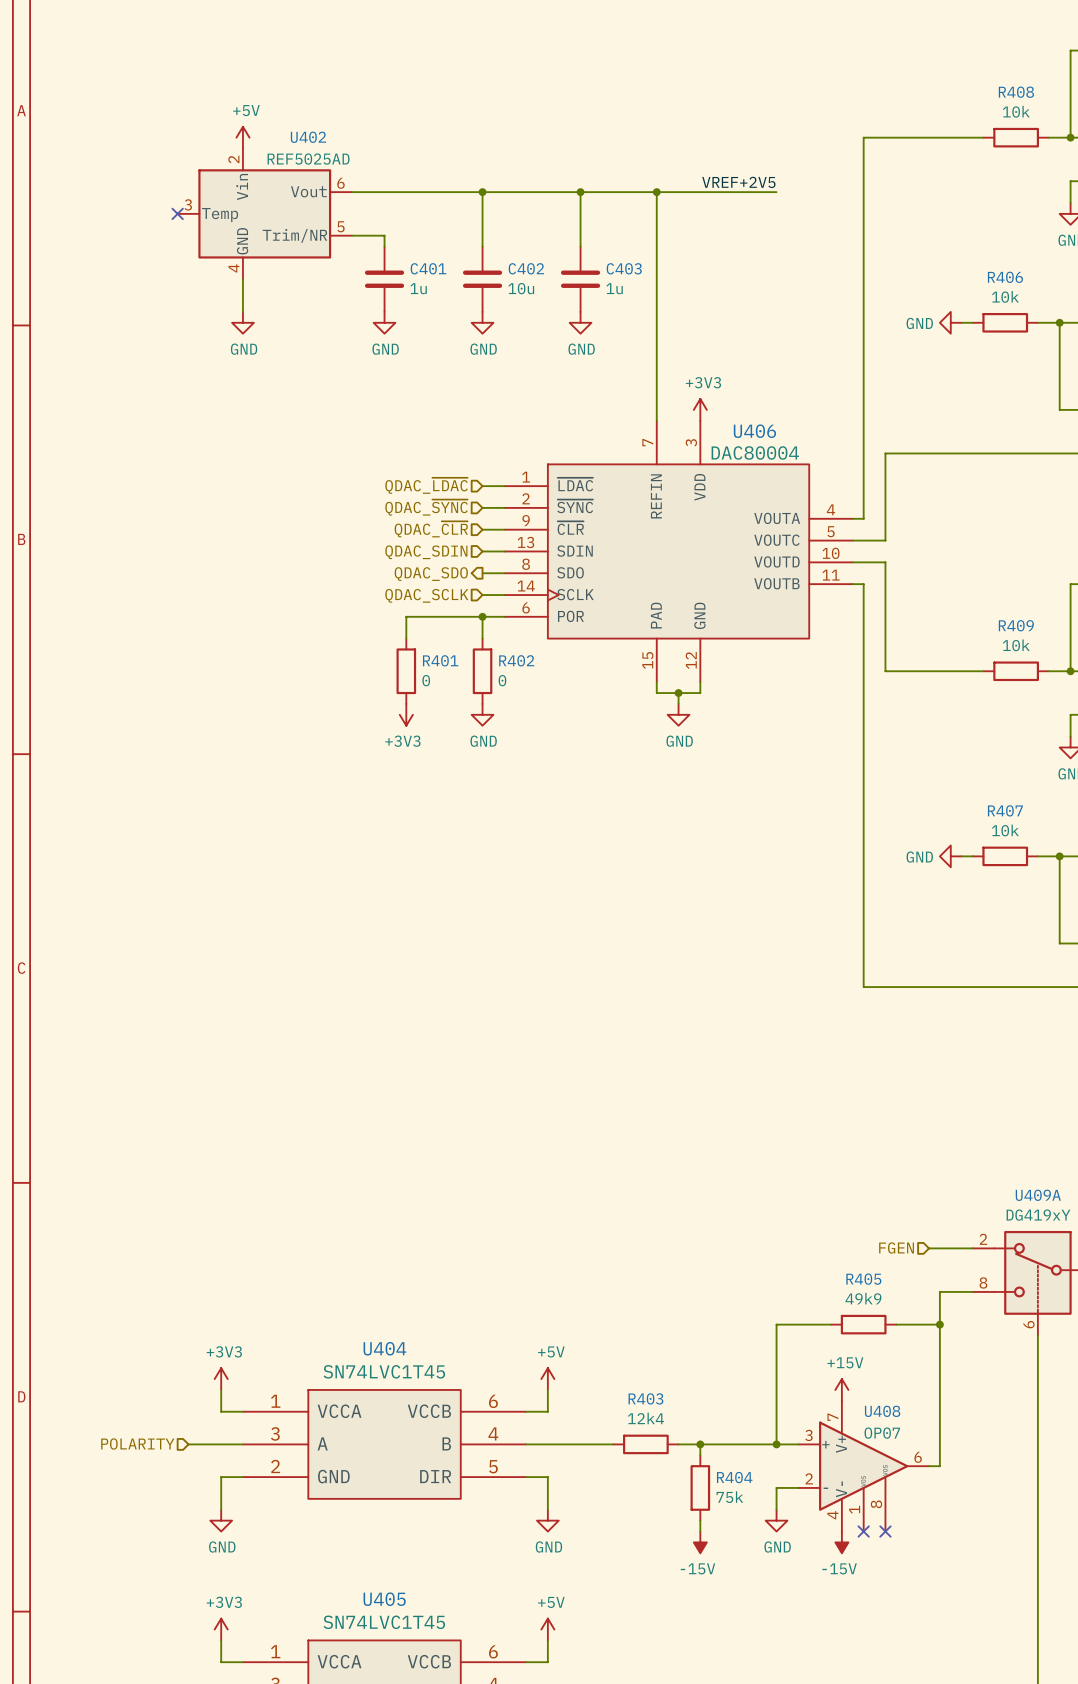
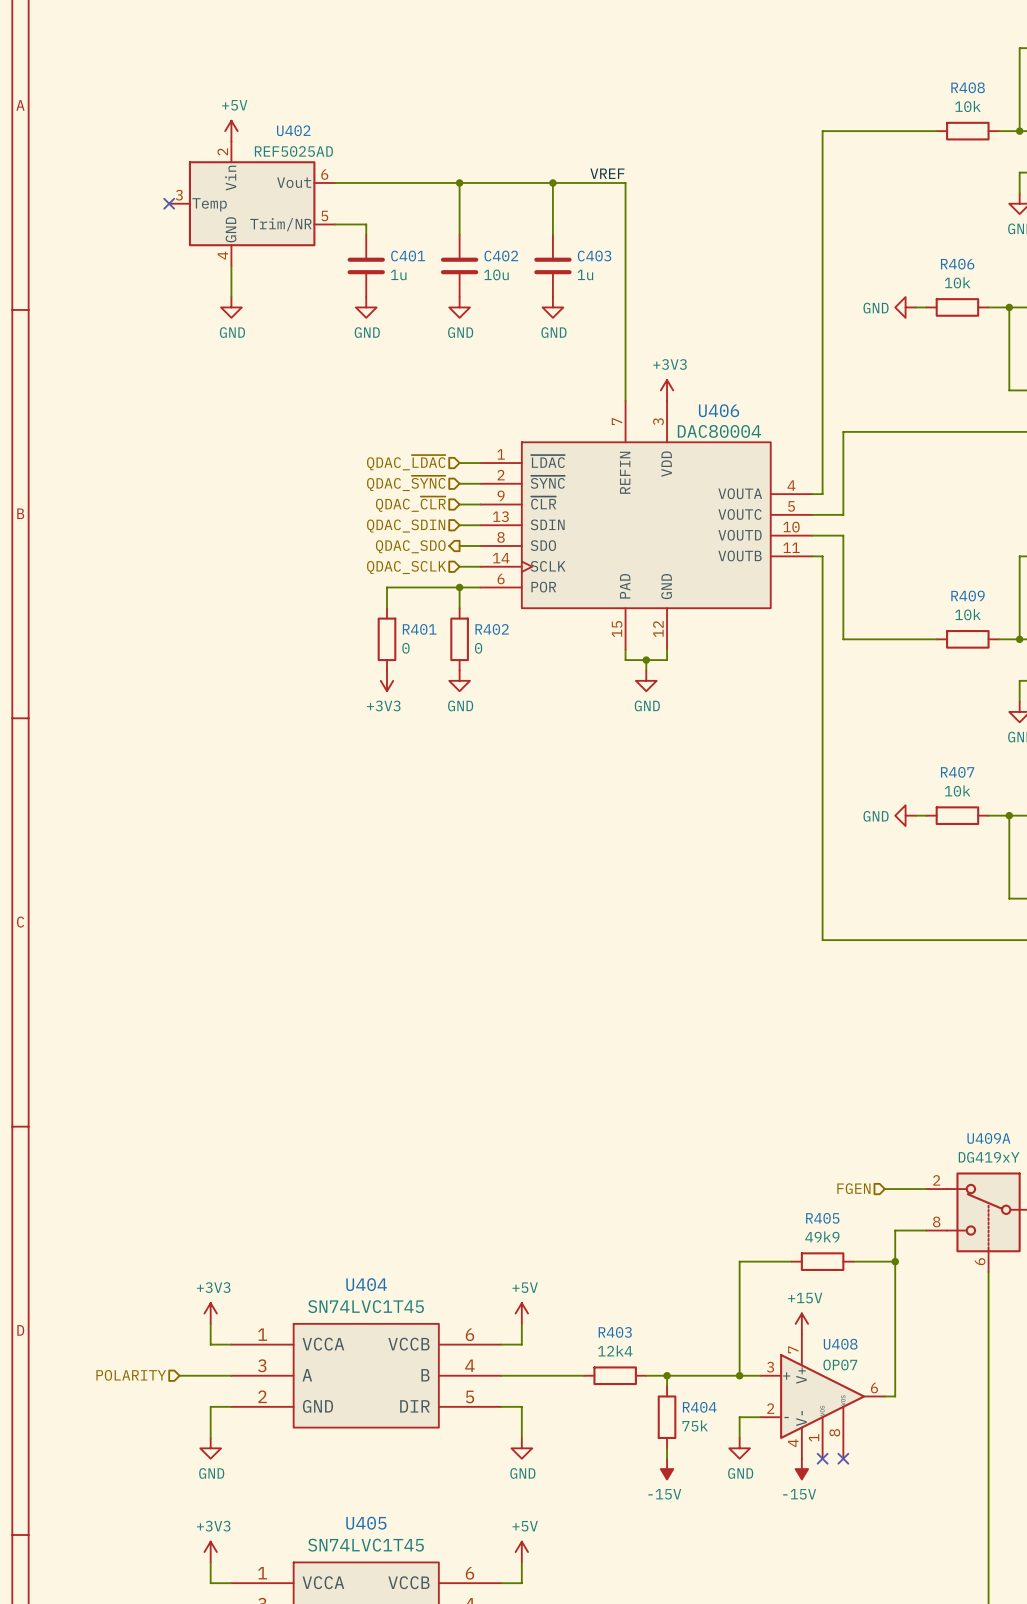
label: none -> VREF (607, 173)
label: VREF+2V5 (738, 182) -> none
wire: (656, 192) (776, 192) -> none
junction: (656, 192) -> none

